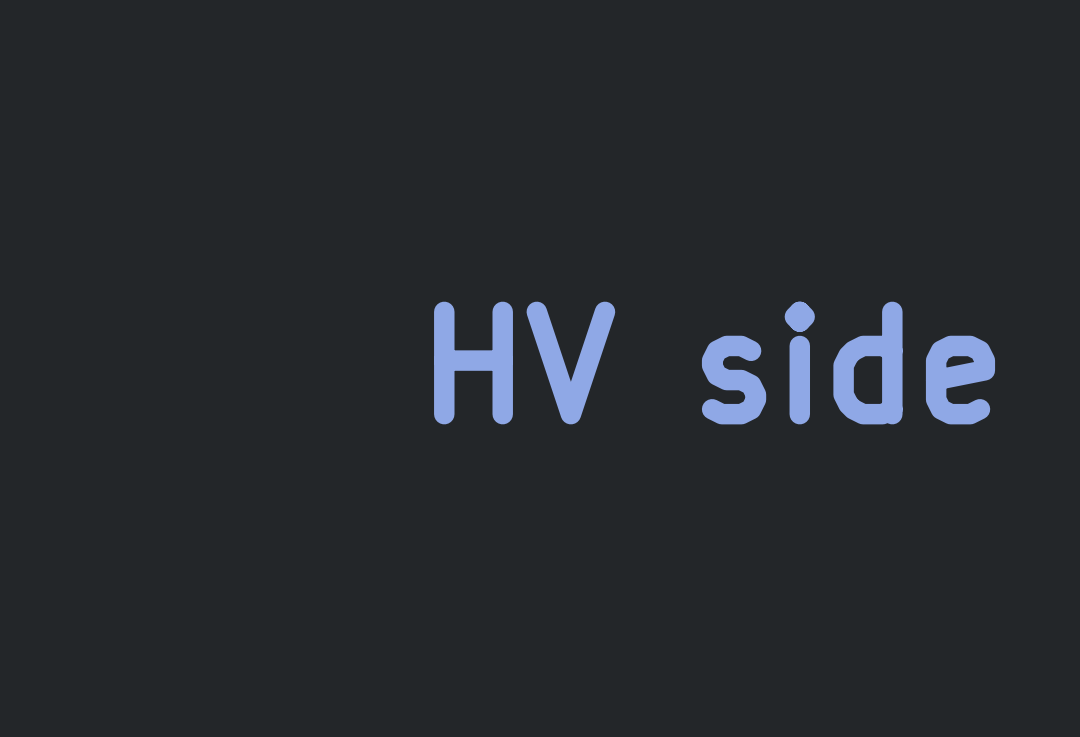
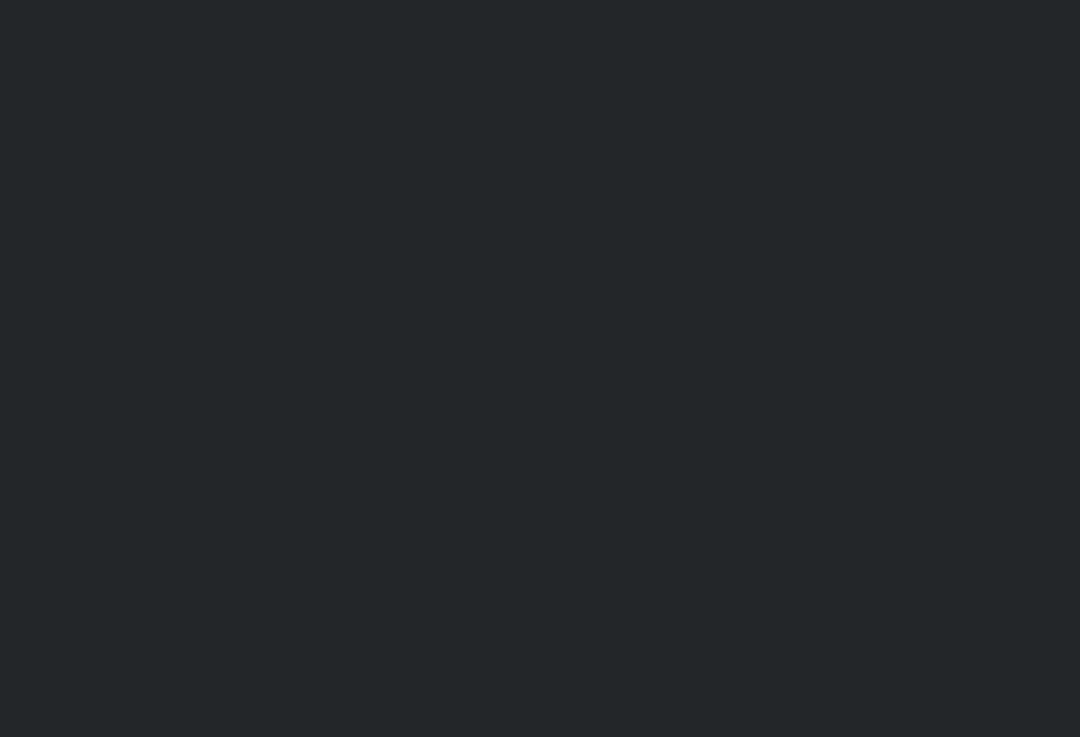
text: HV side (714, 363) -> none

